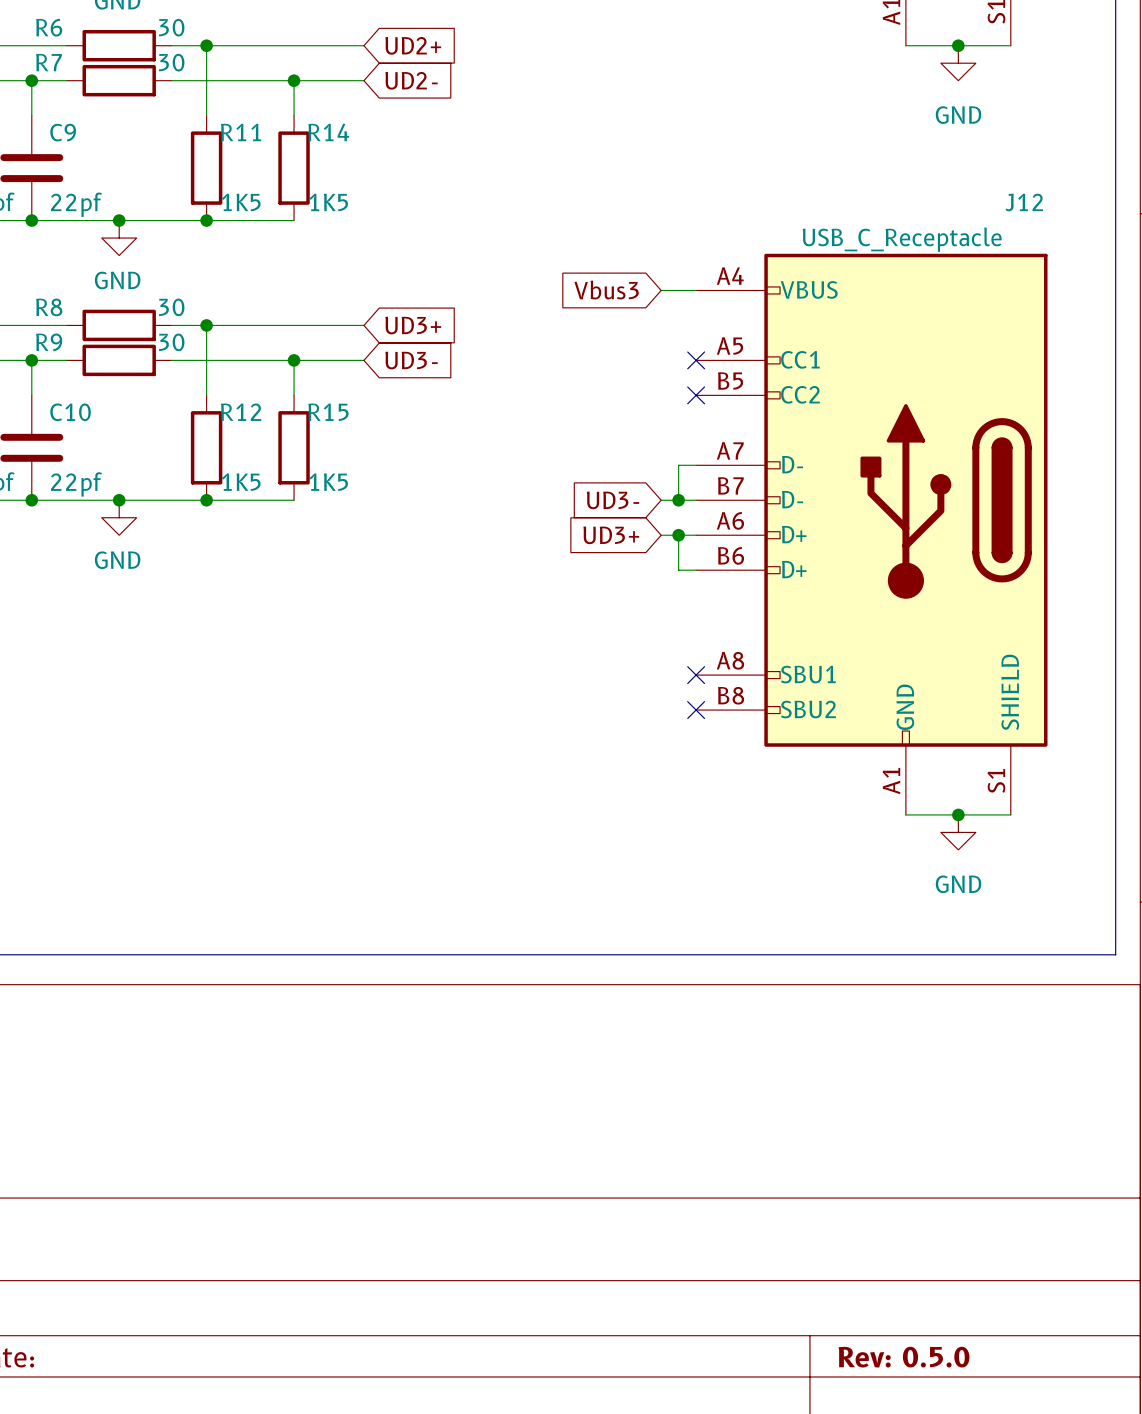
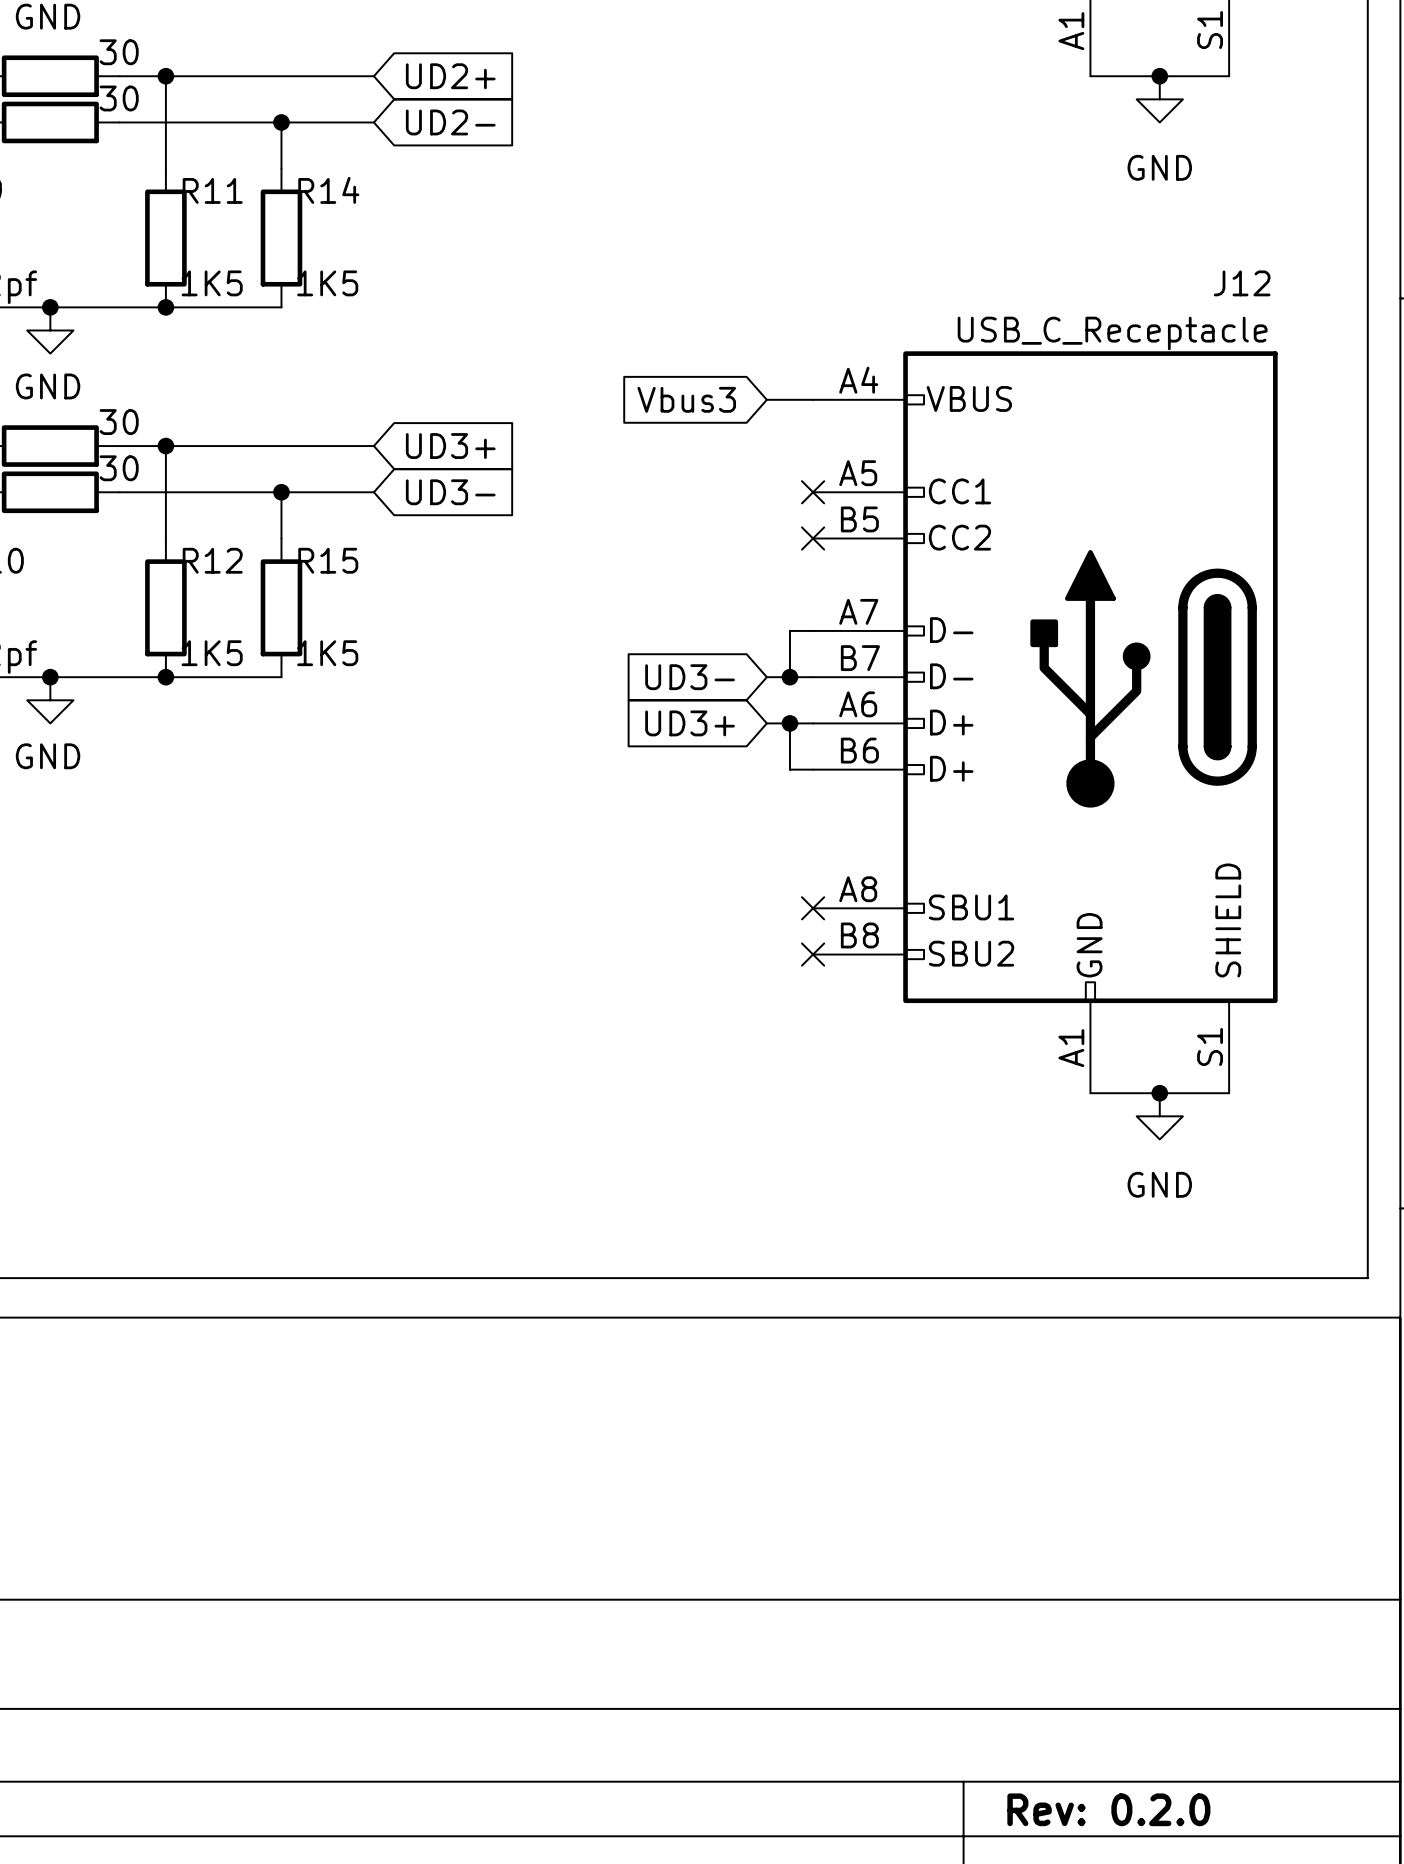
title block: Rev: 0.5.0 (904, 1357) -> Rev: 0.2.0 (1108, 1809)

